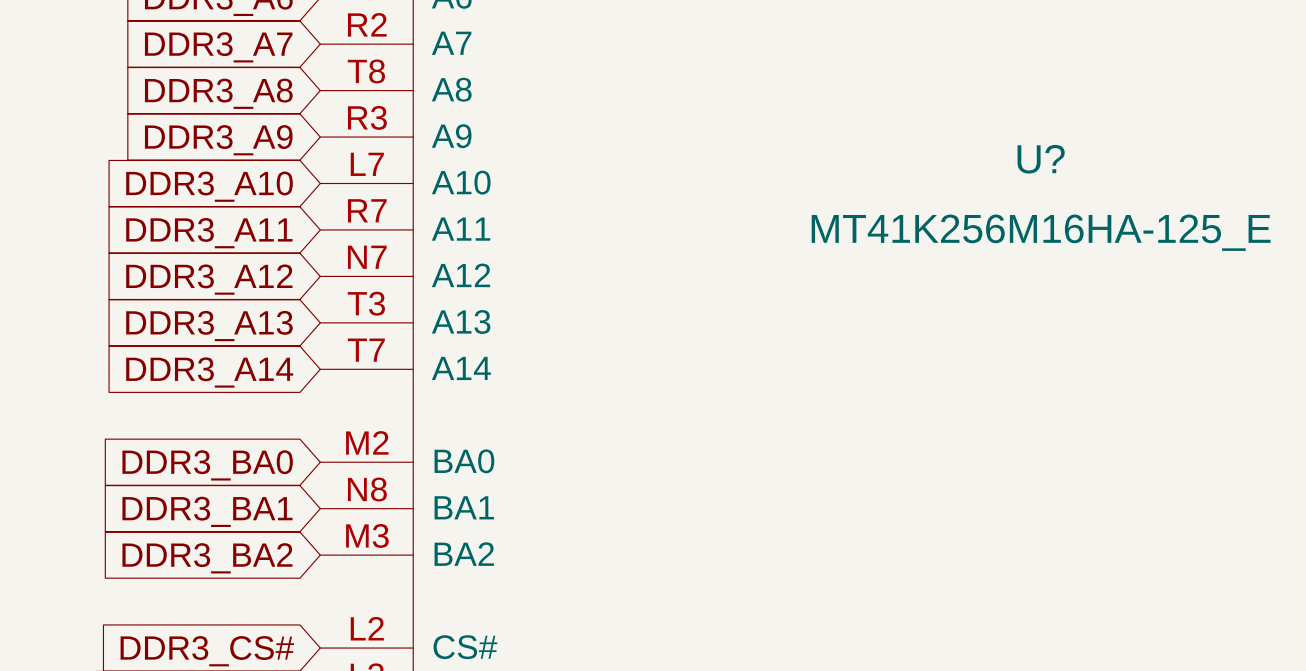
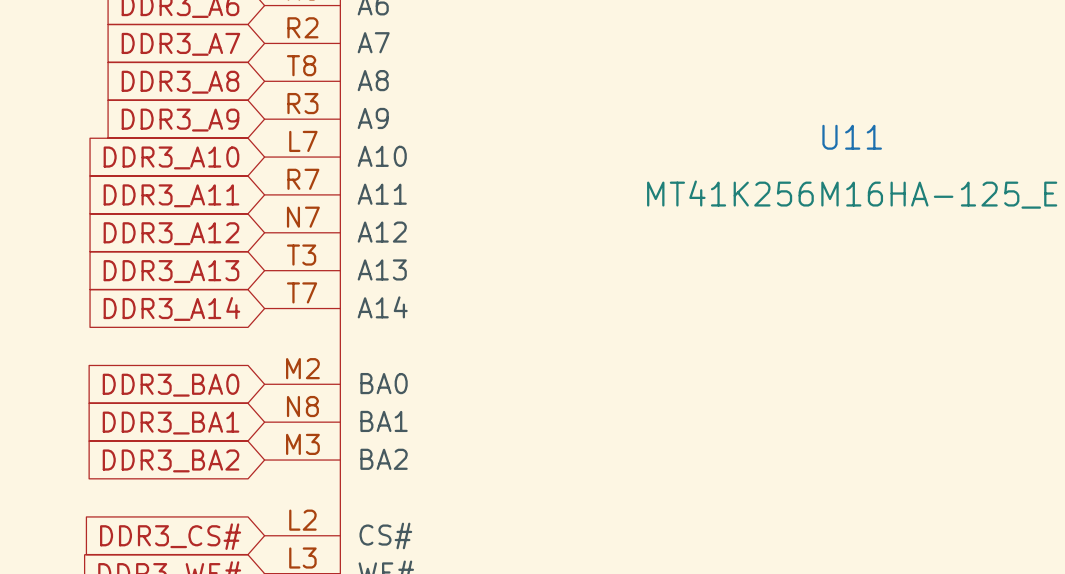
U? name: U? (1041, 159) -> U11 (852, 137)

